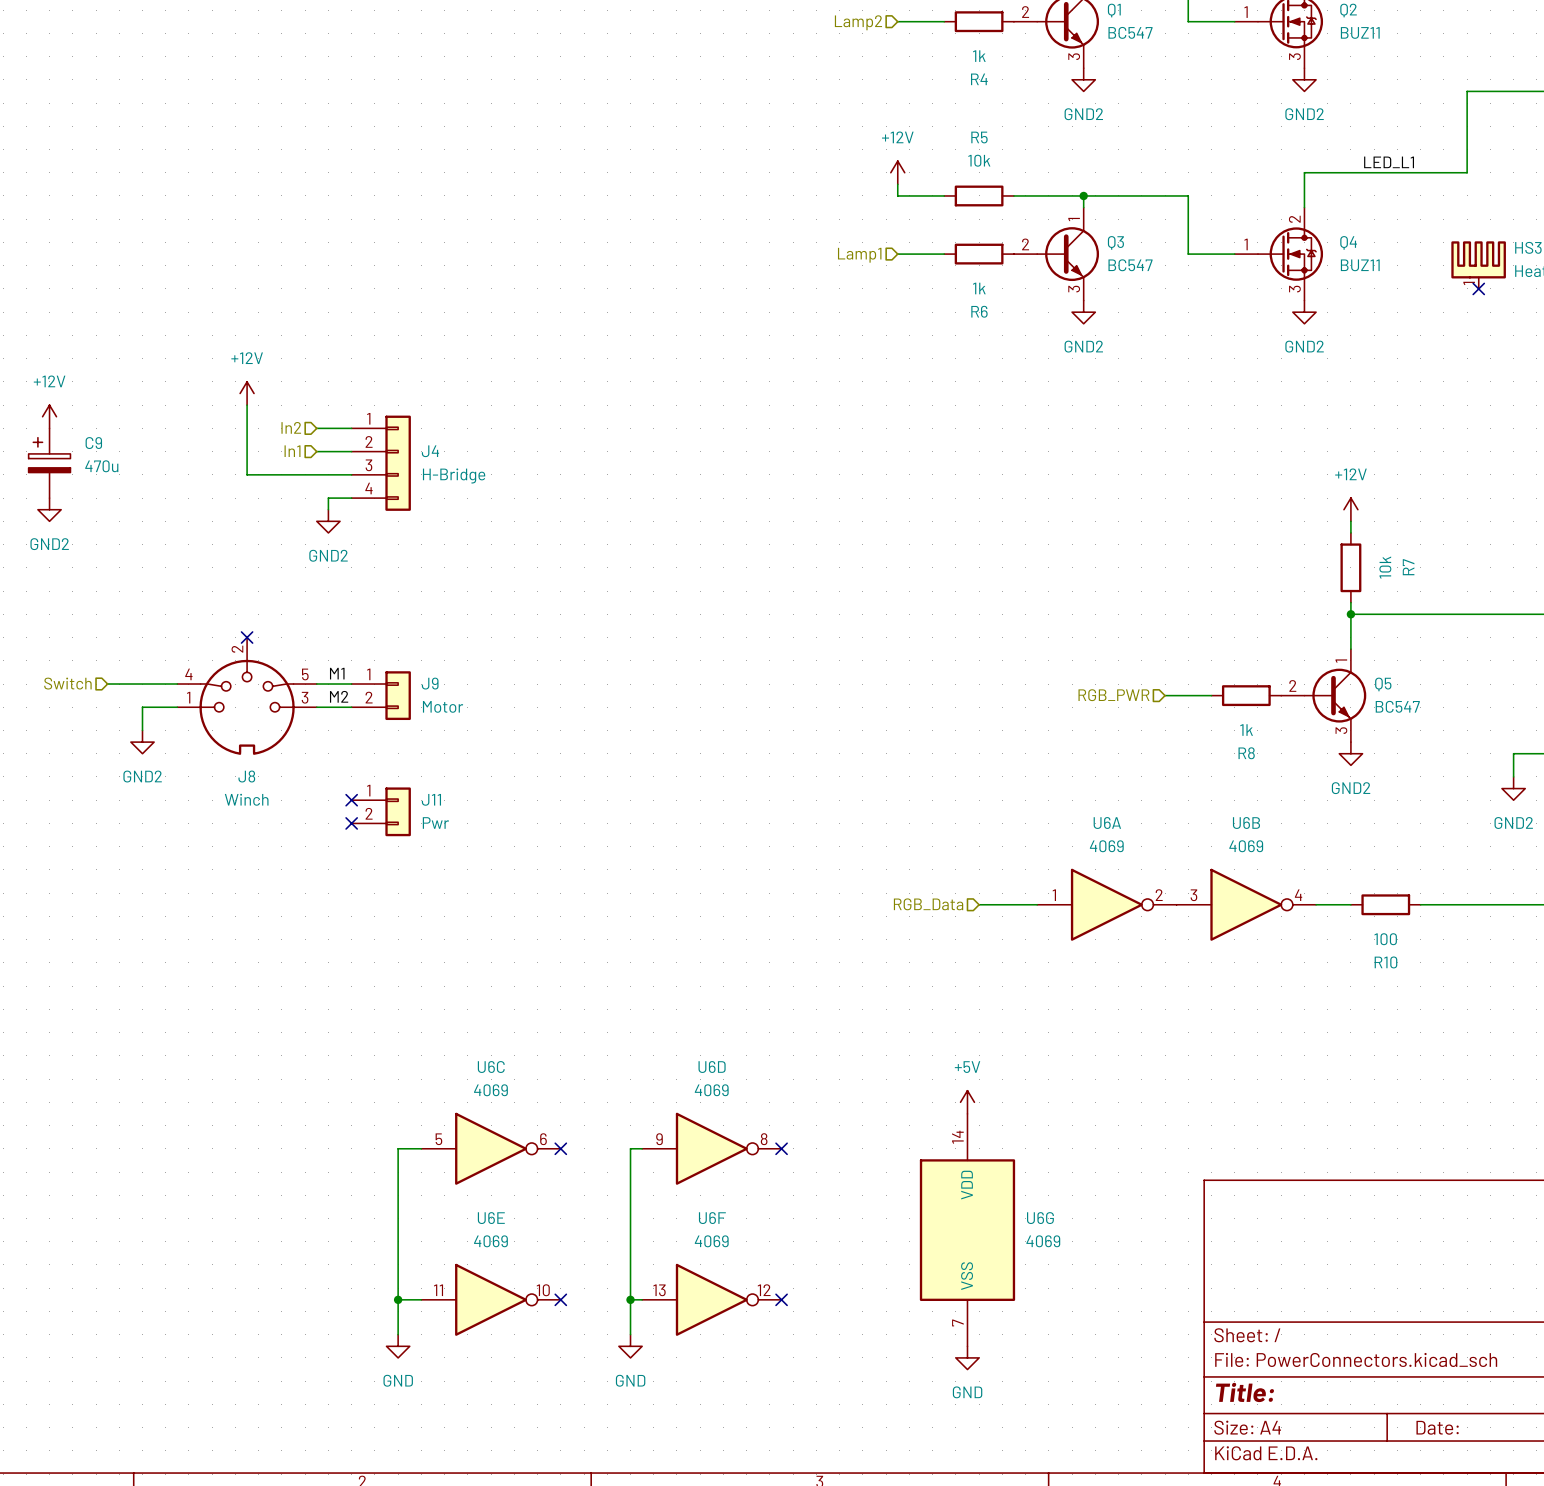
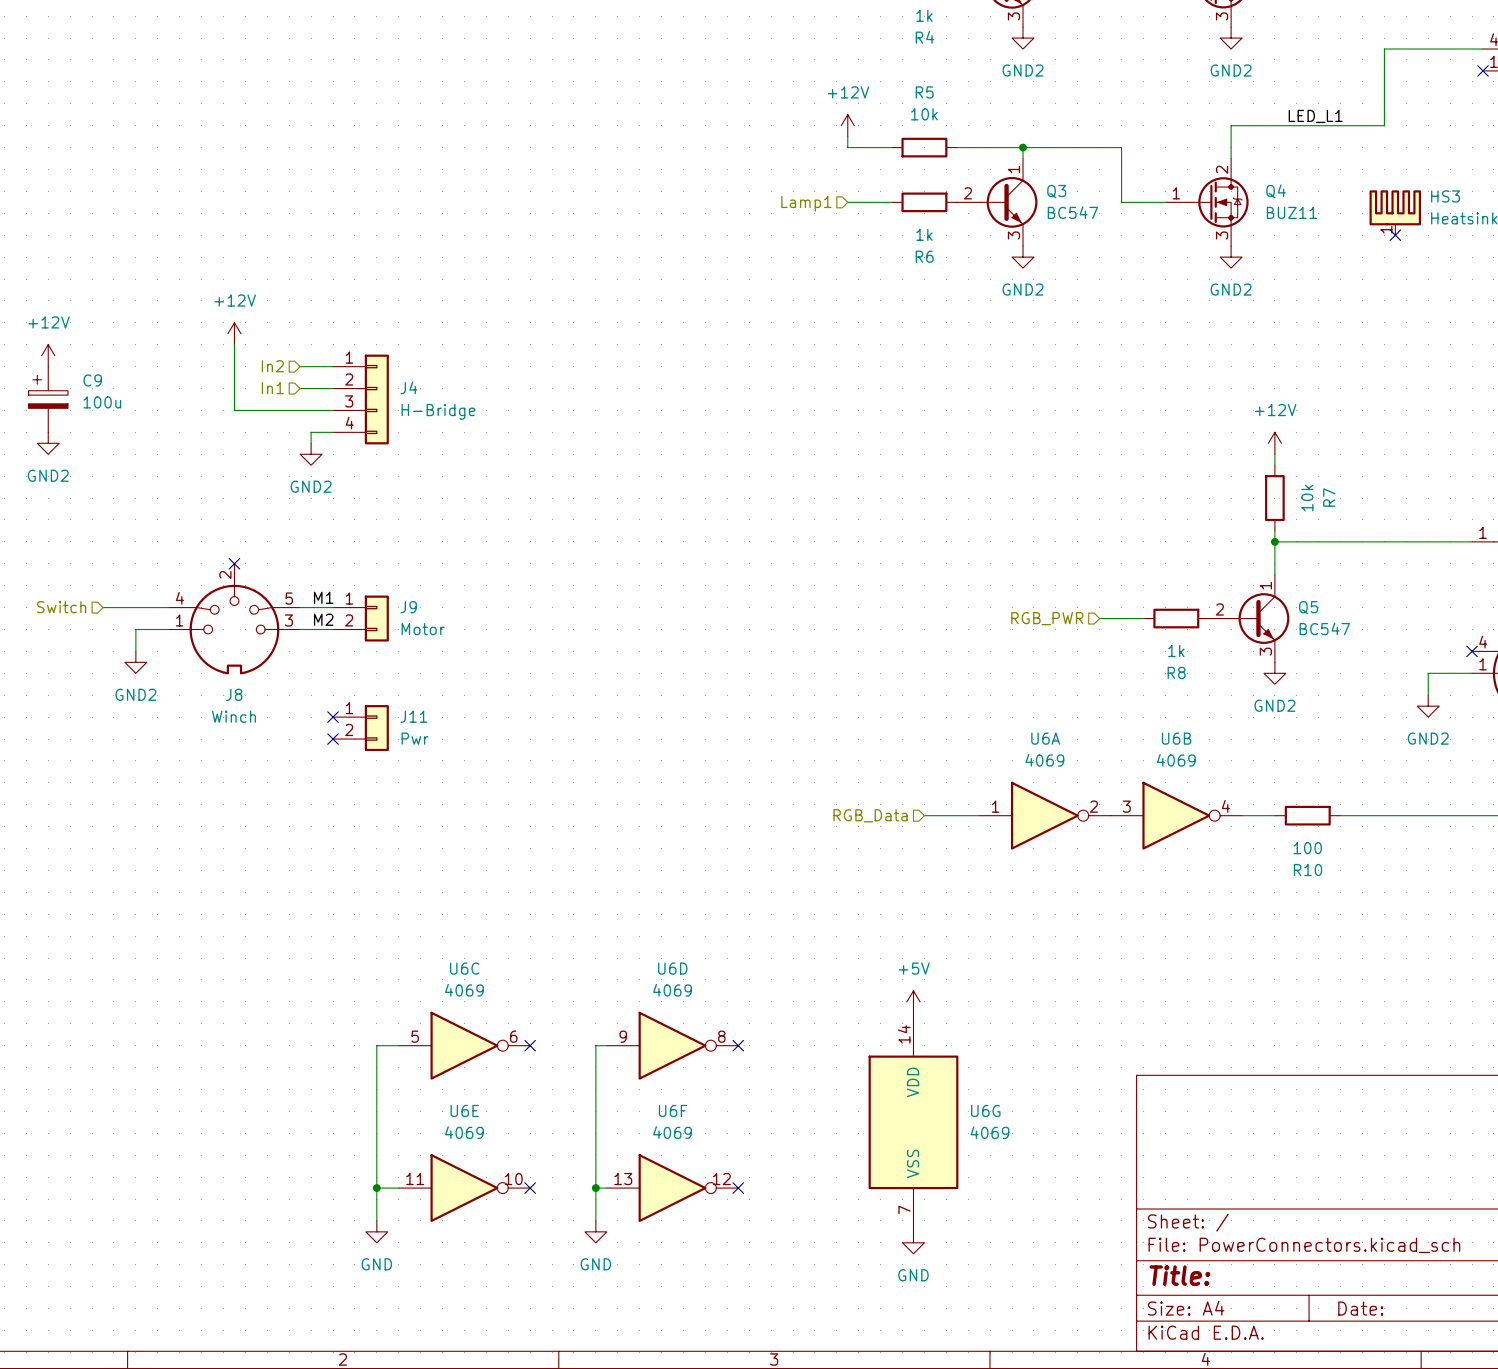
C9 value: 470u (101, 466) -> 100u (102, 402)

